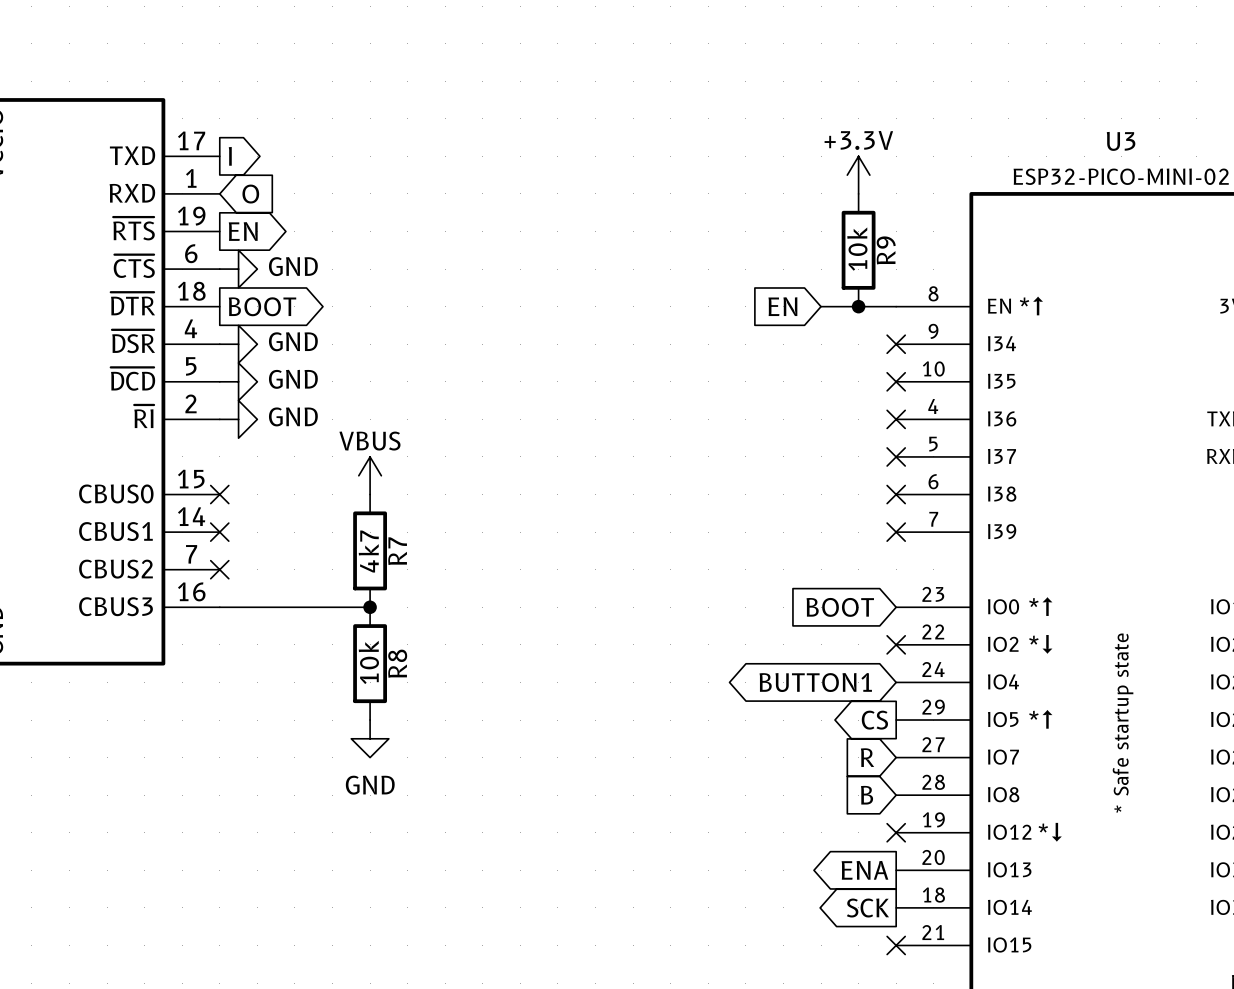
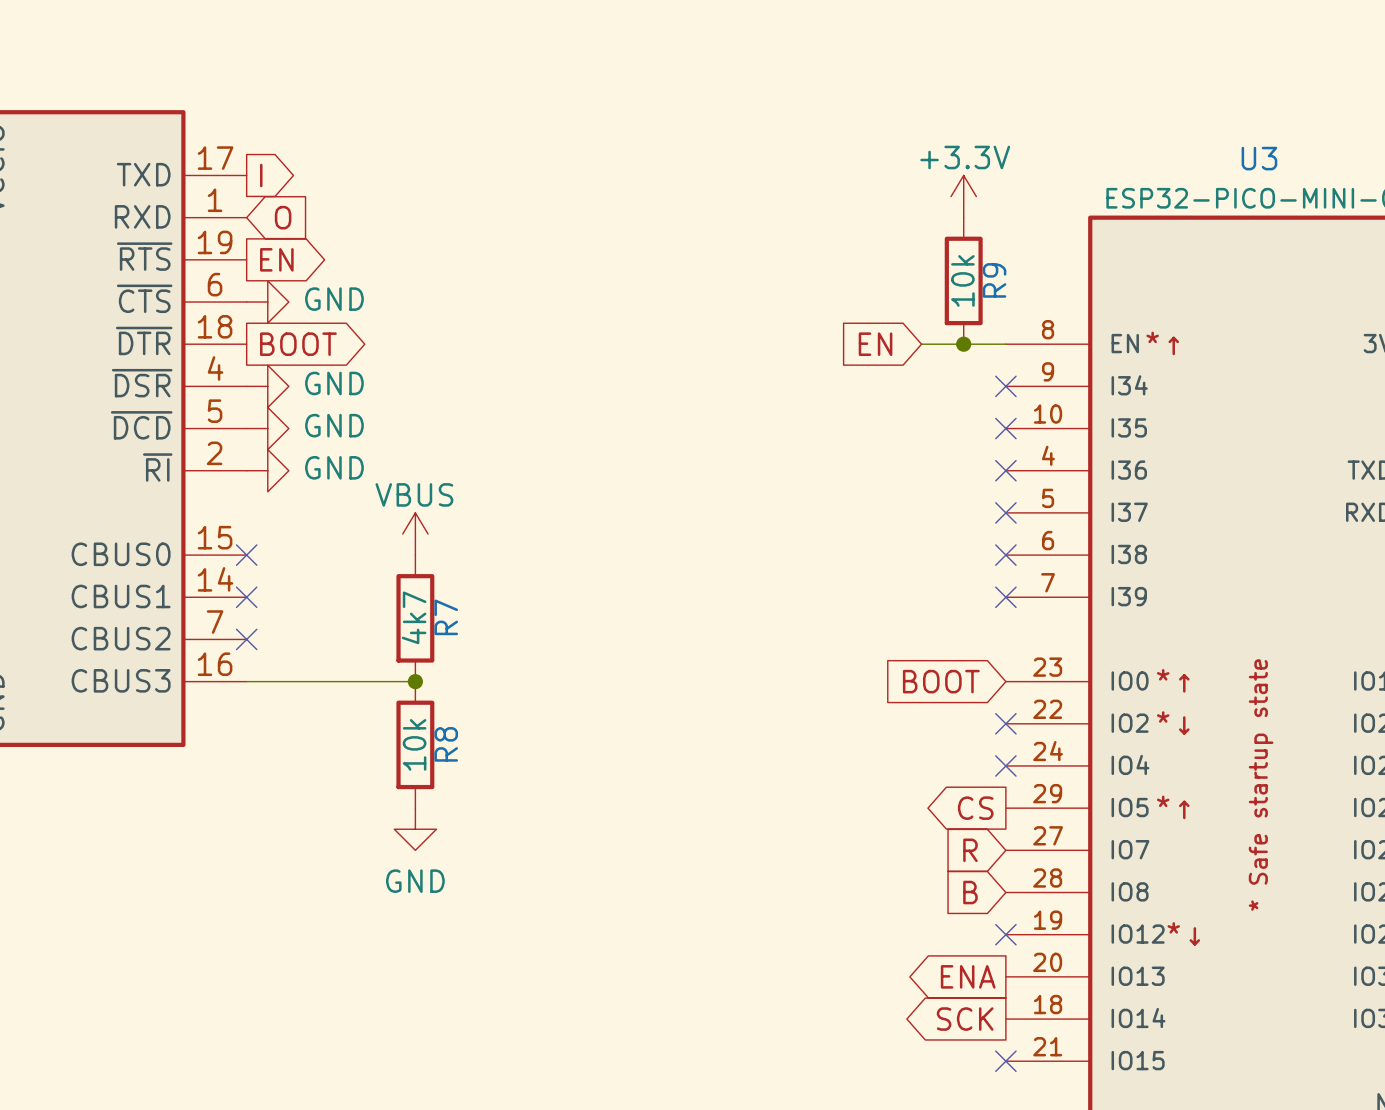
global label: BUTTON1 (815, 682) -> none
no-connect mark: none -> (1005, 765)

